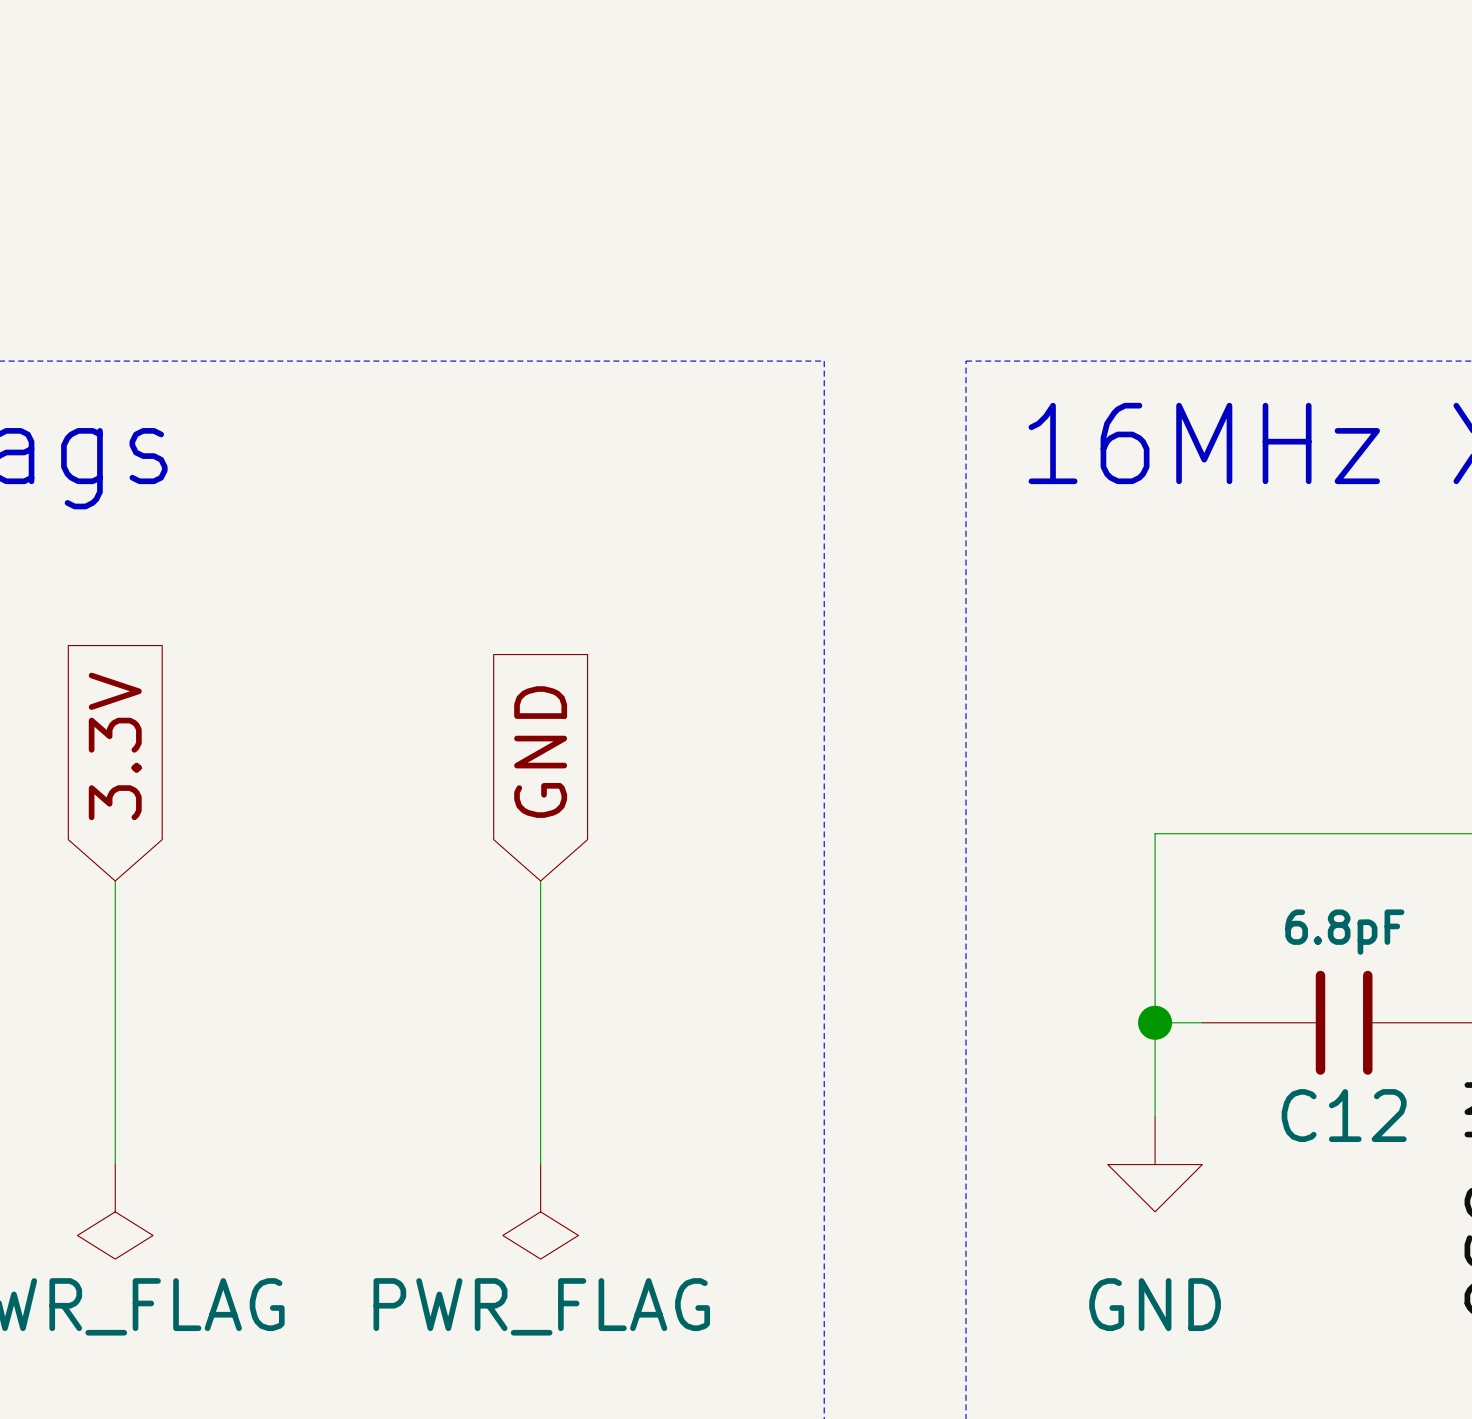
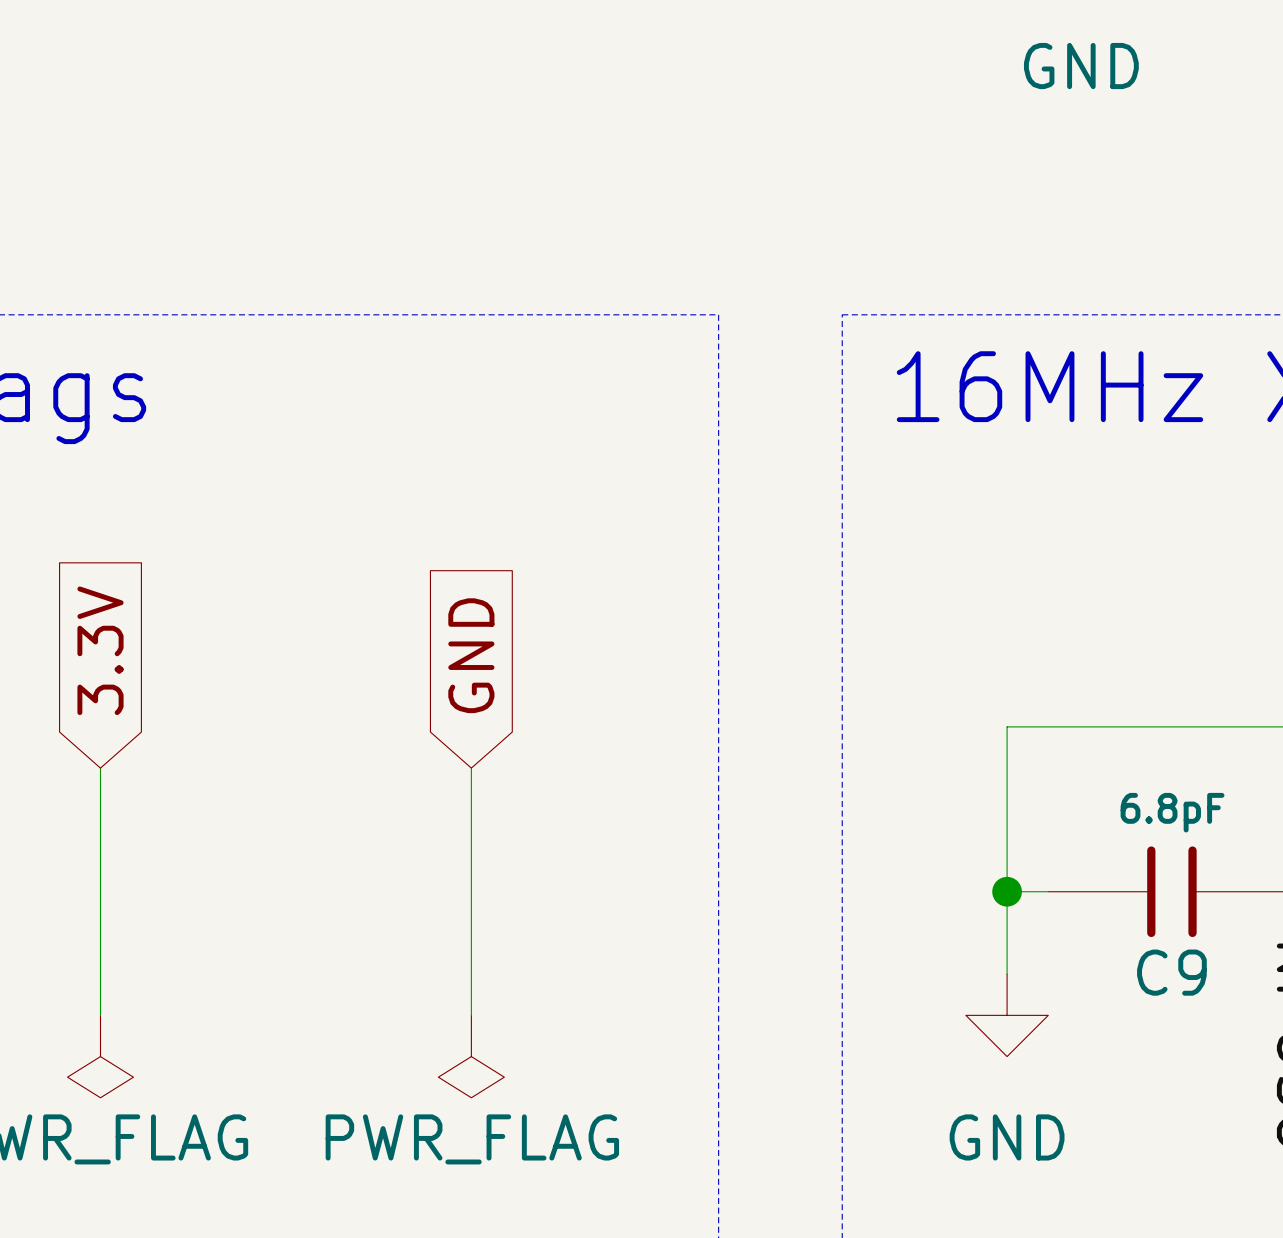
power symbol text: none -> GND (1081, 66)
C12 name: C12 (1344, 1115) -> C9 (1171, 972)

